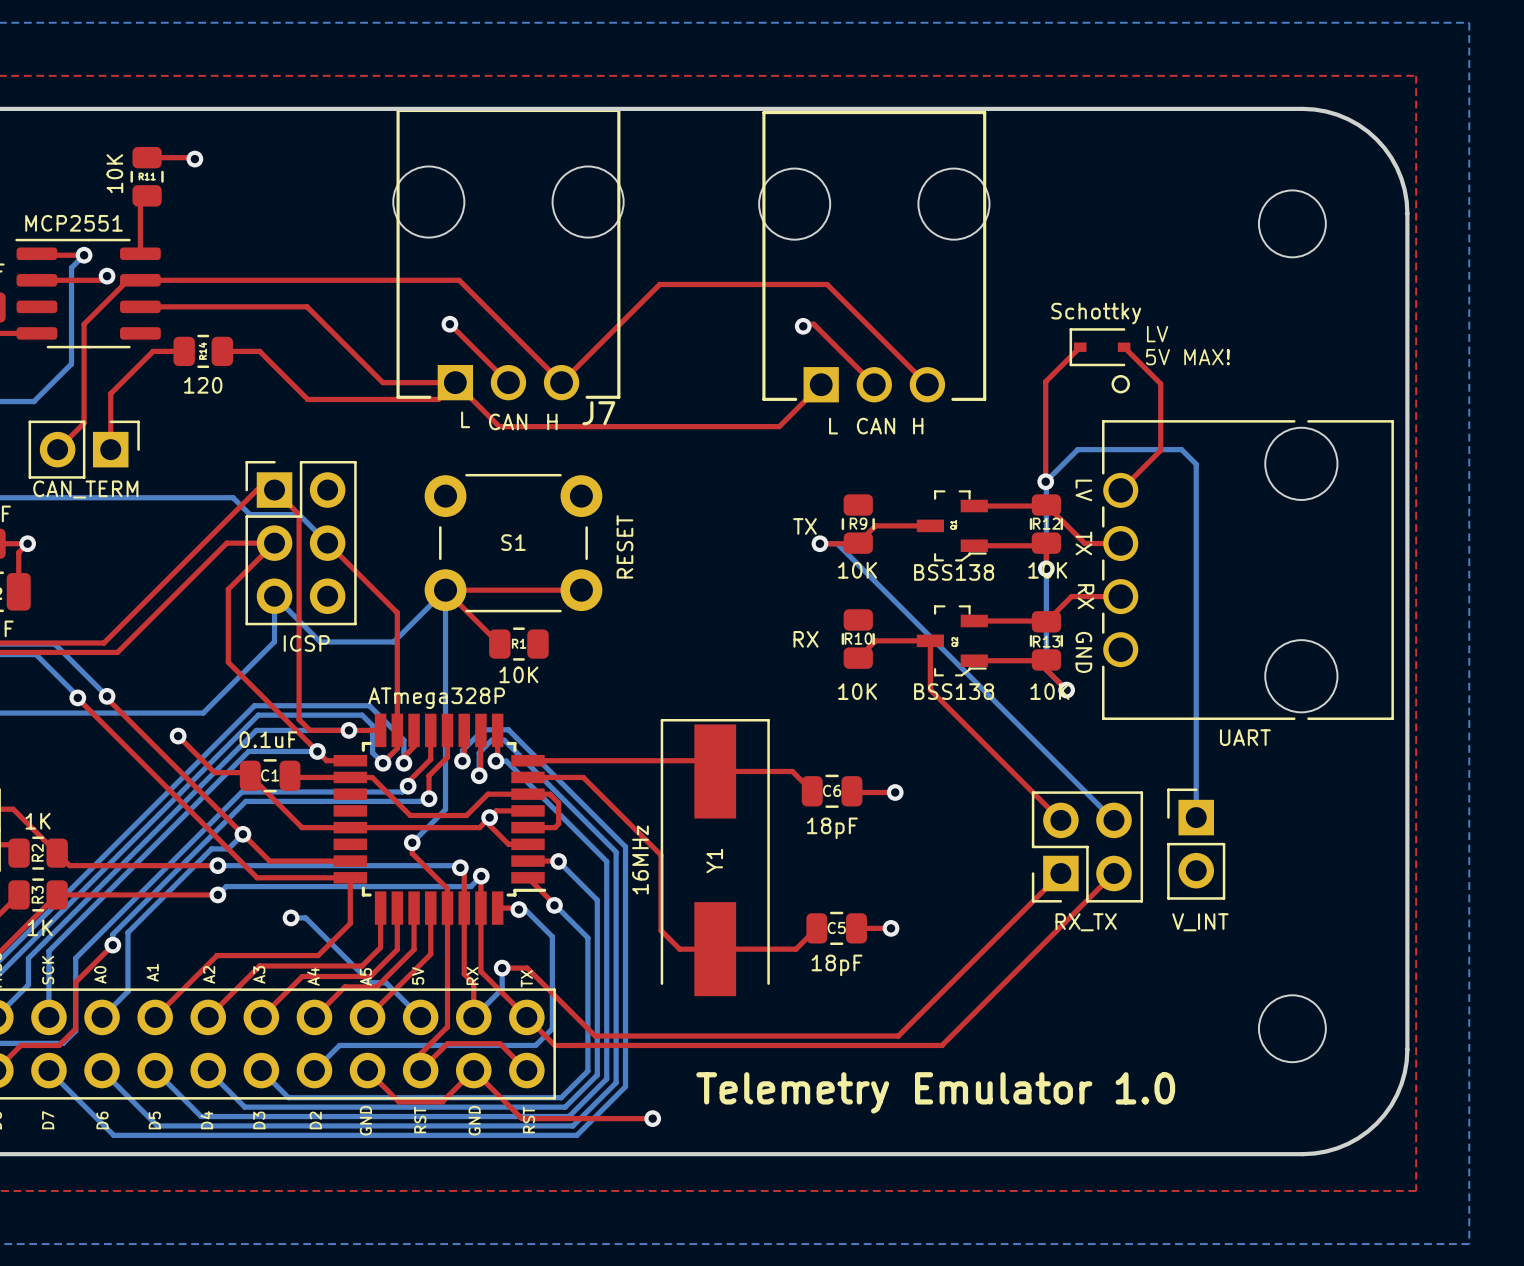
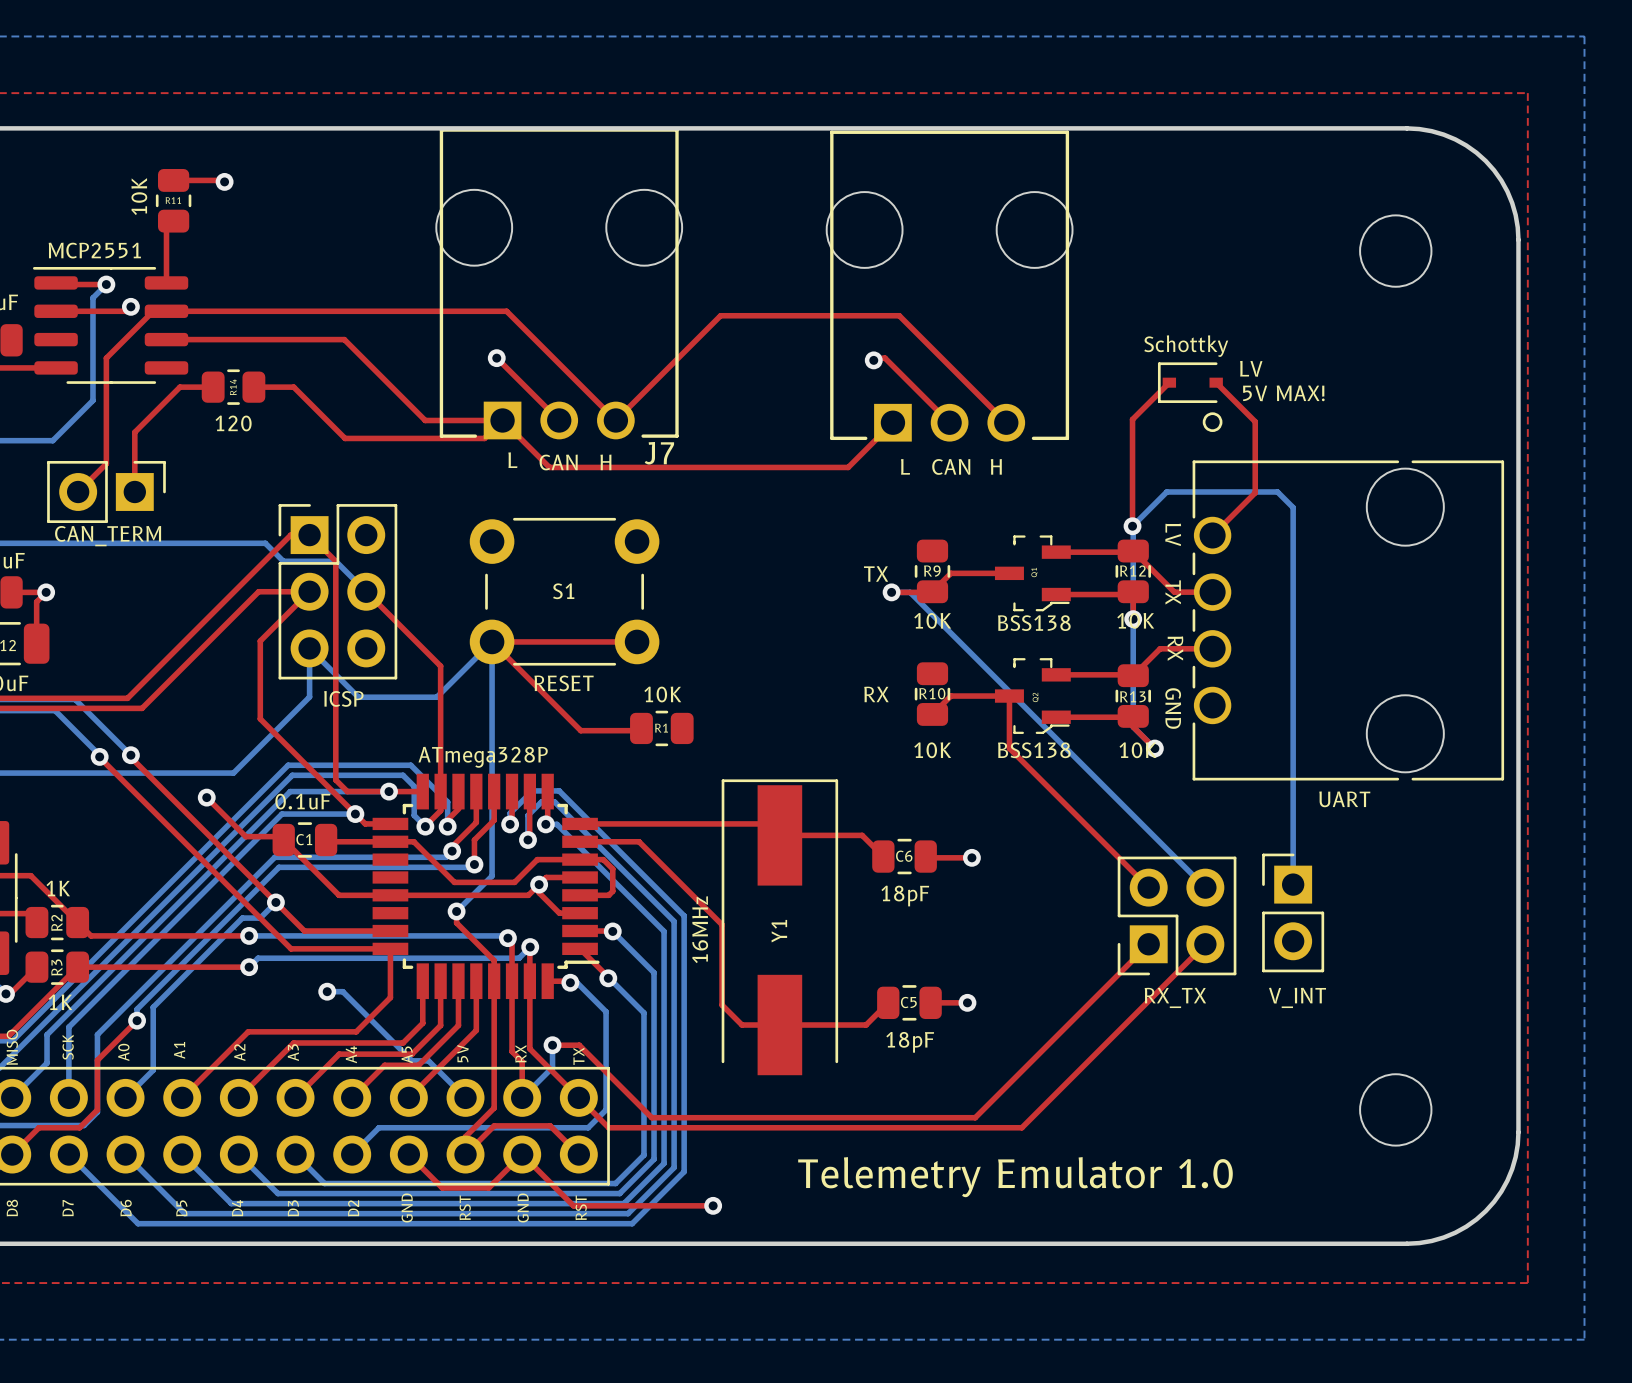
S1 value rotation: 0° (624, 546) -> 90° clockwise (564, 683)
S1 value position: RESET (624, 546) -> RESET (564, 683)
top track: none -> (549, 699) (580, 730) (639, 730) (641, 728)
R1 position: (518, 644) -> (661, 728)
R1 value position: 10K (518, 674) -> 10K (662, 694)

